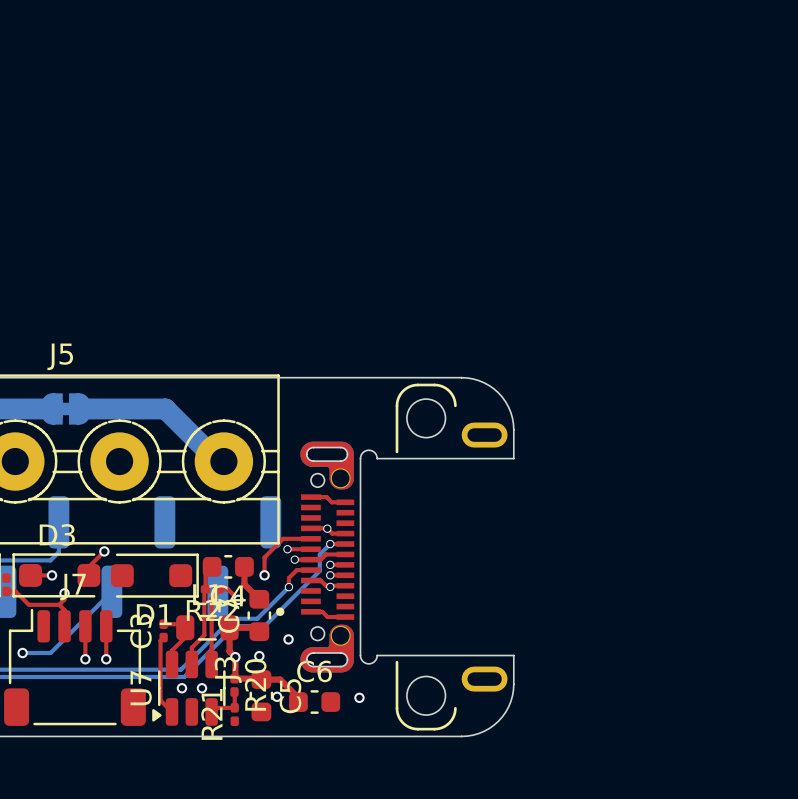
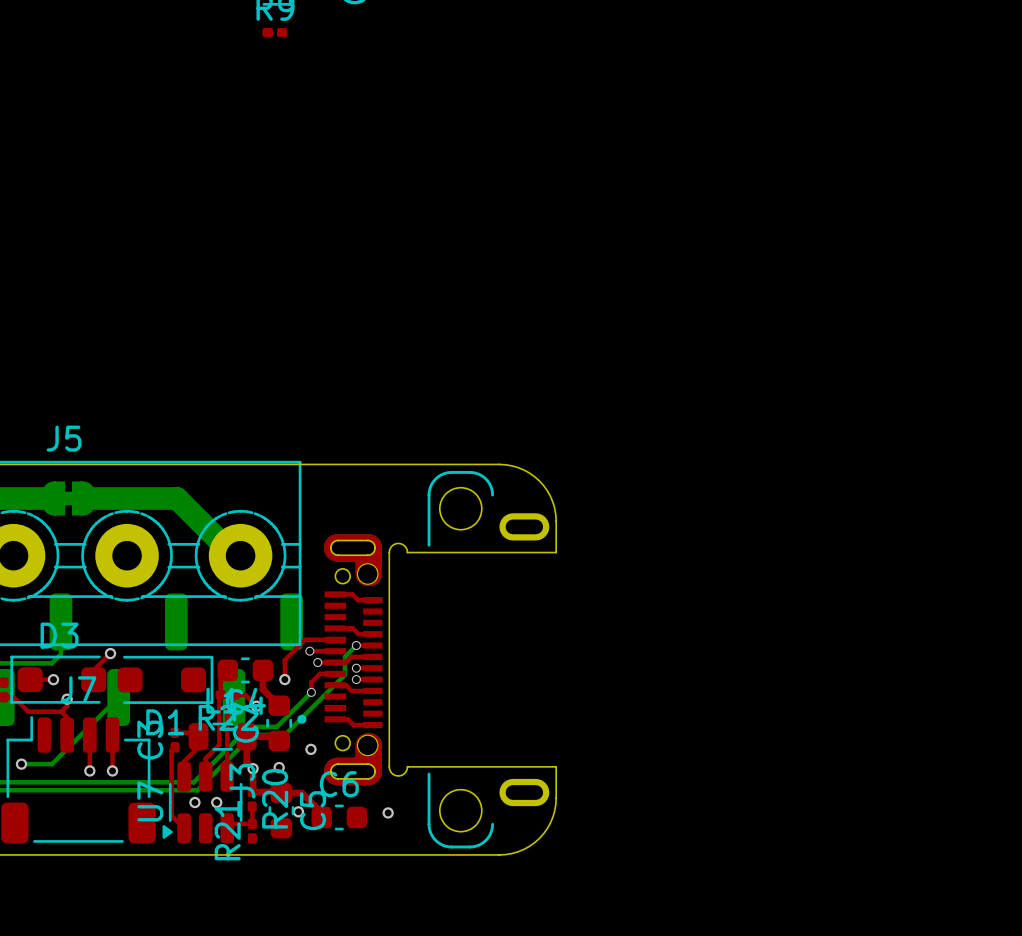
via: (327, 528) -> none
via: (330, 586) -> none

